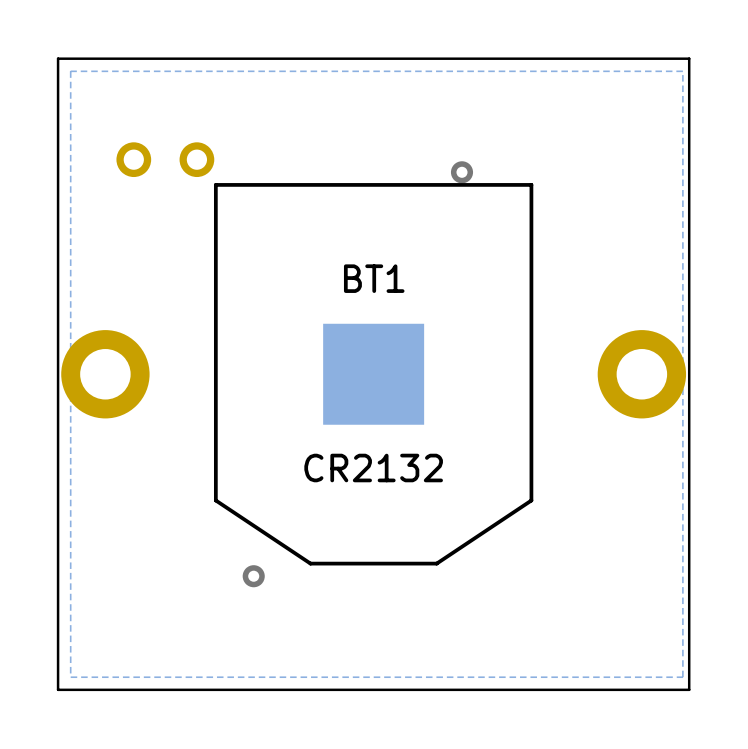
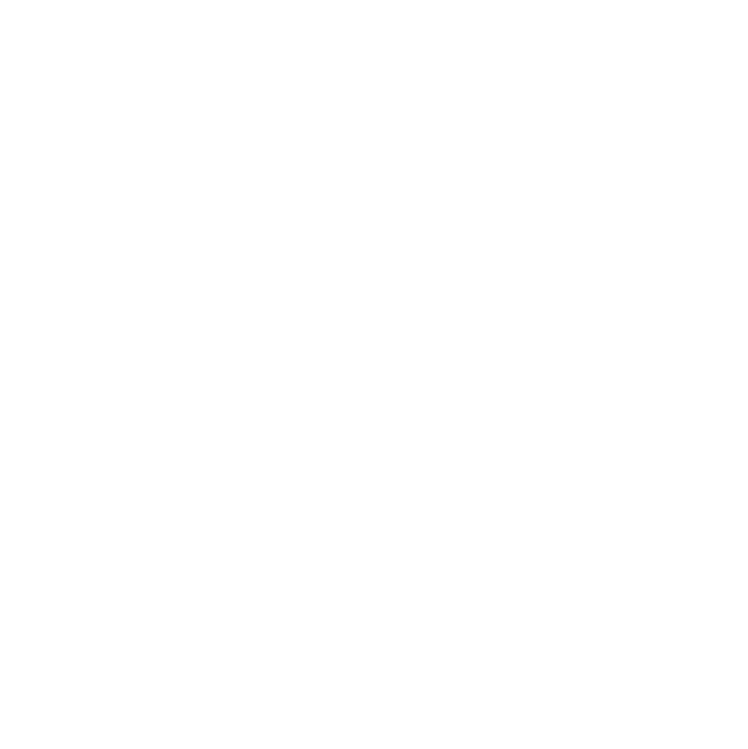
board edge: (689, 58) (58, 58) (58, 689) (689, 689) (689, 58) -> none
zone outline: (682, 71) (682, 677) (70, 677) (70, 71) (682, 71) -> none
part: (165, 159) -> none
via: (461, 172) -> none
BT1: CR2132 (373, 374) -> none
via: (253, 576) -> none

